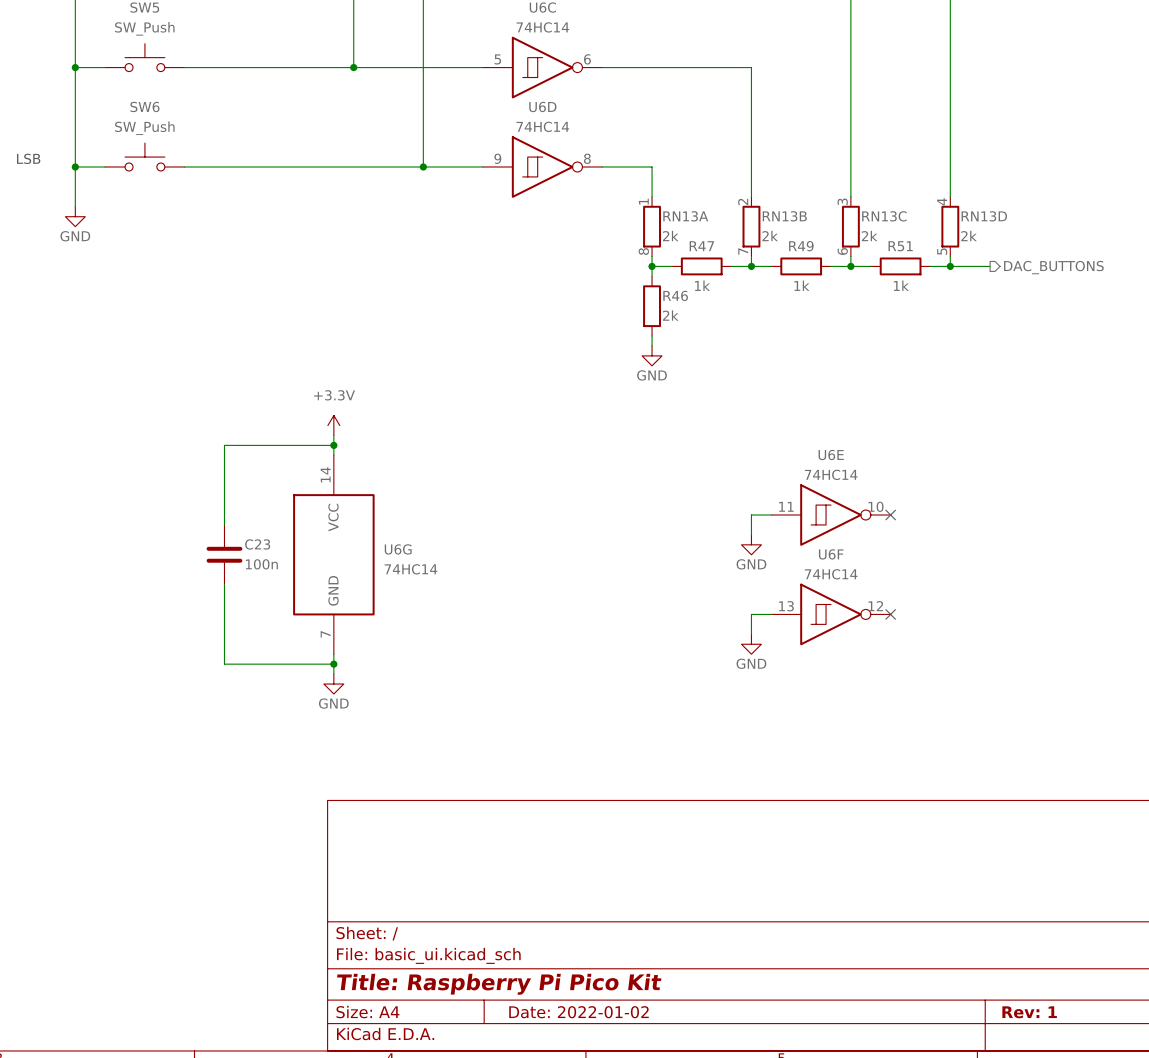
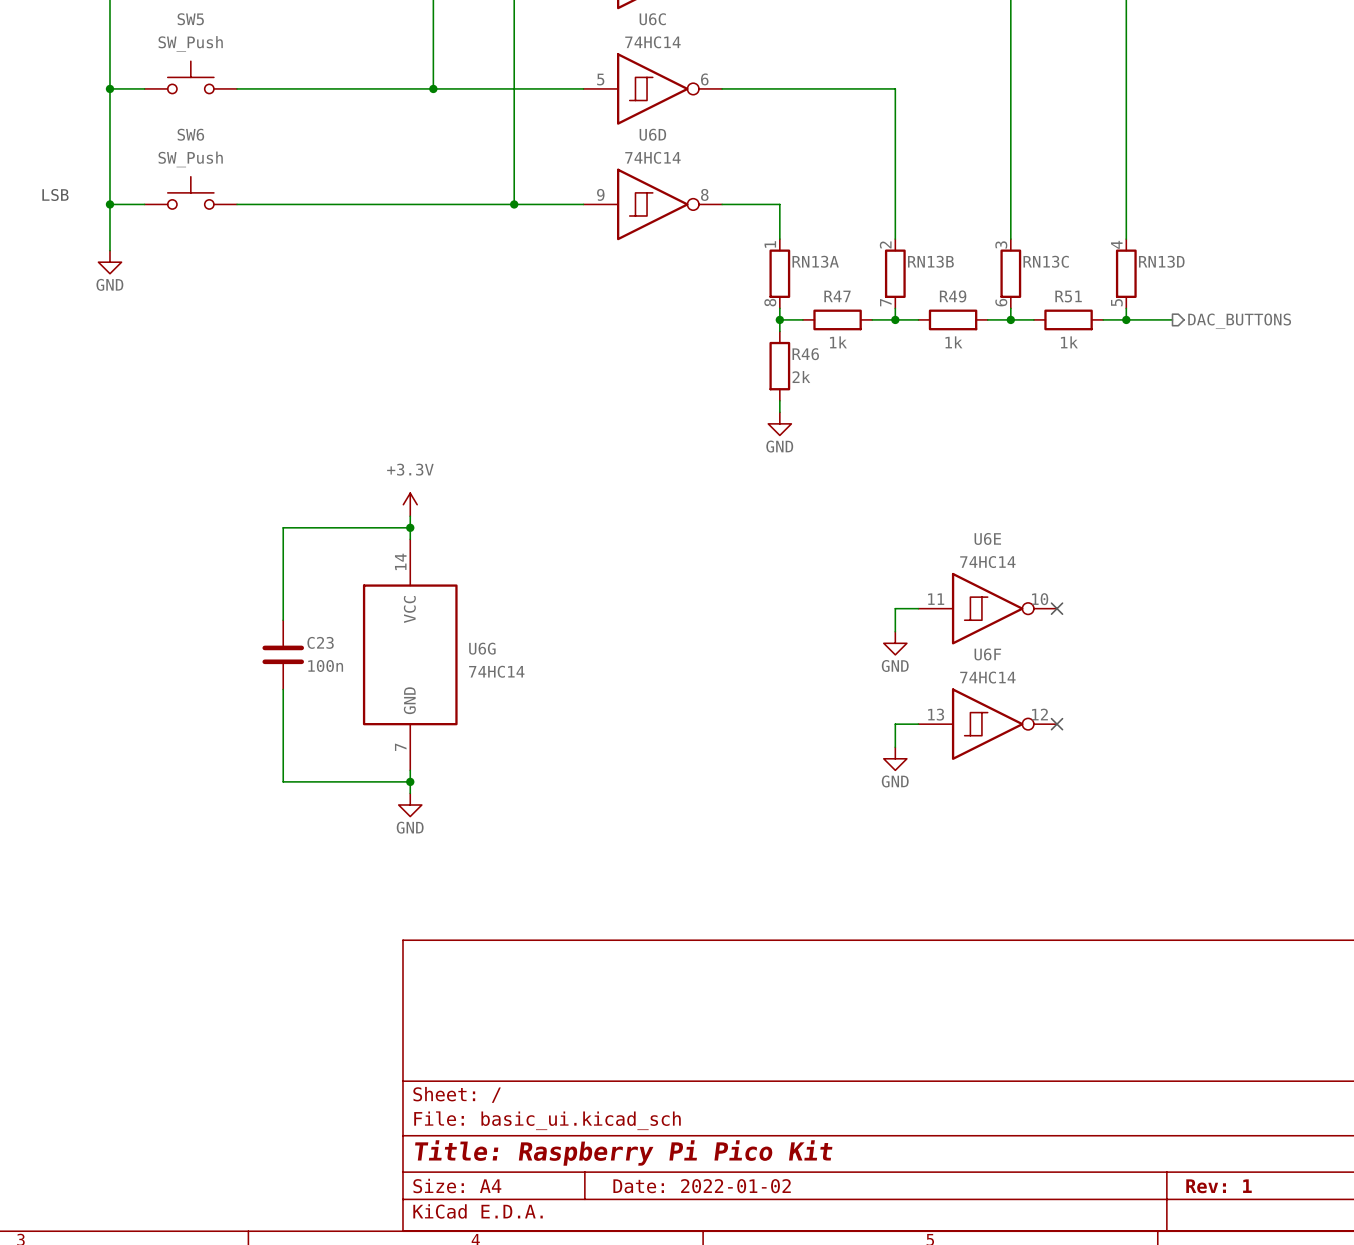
RN13A value: 2k (670, 236) -> none
RN13B value: 2k (770, 236) -> none
RN13C value: 2k (869, 236) -> none
RN13D value: 2k (969, 236) -> none

